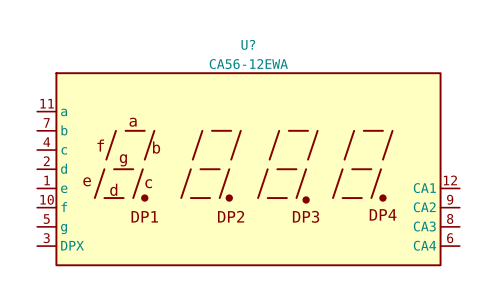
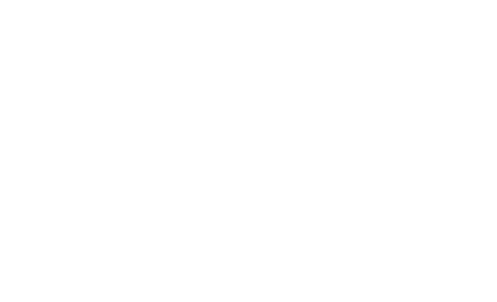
U?: CA56-12EWA (248, 169) -> none

